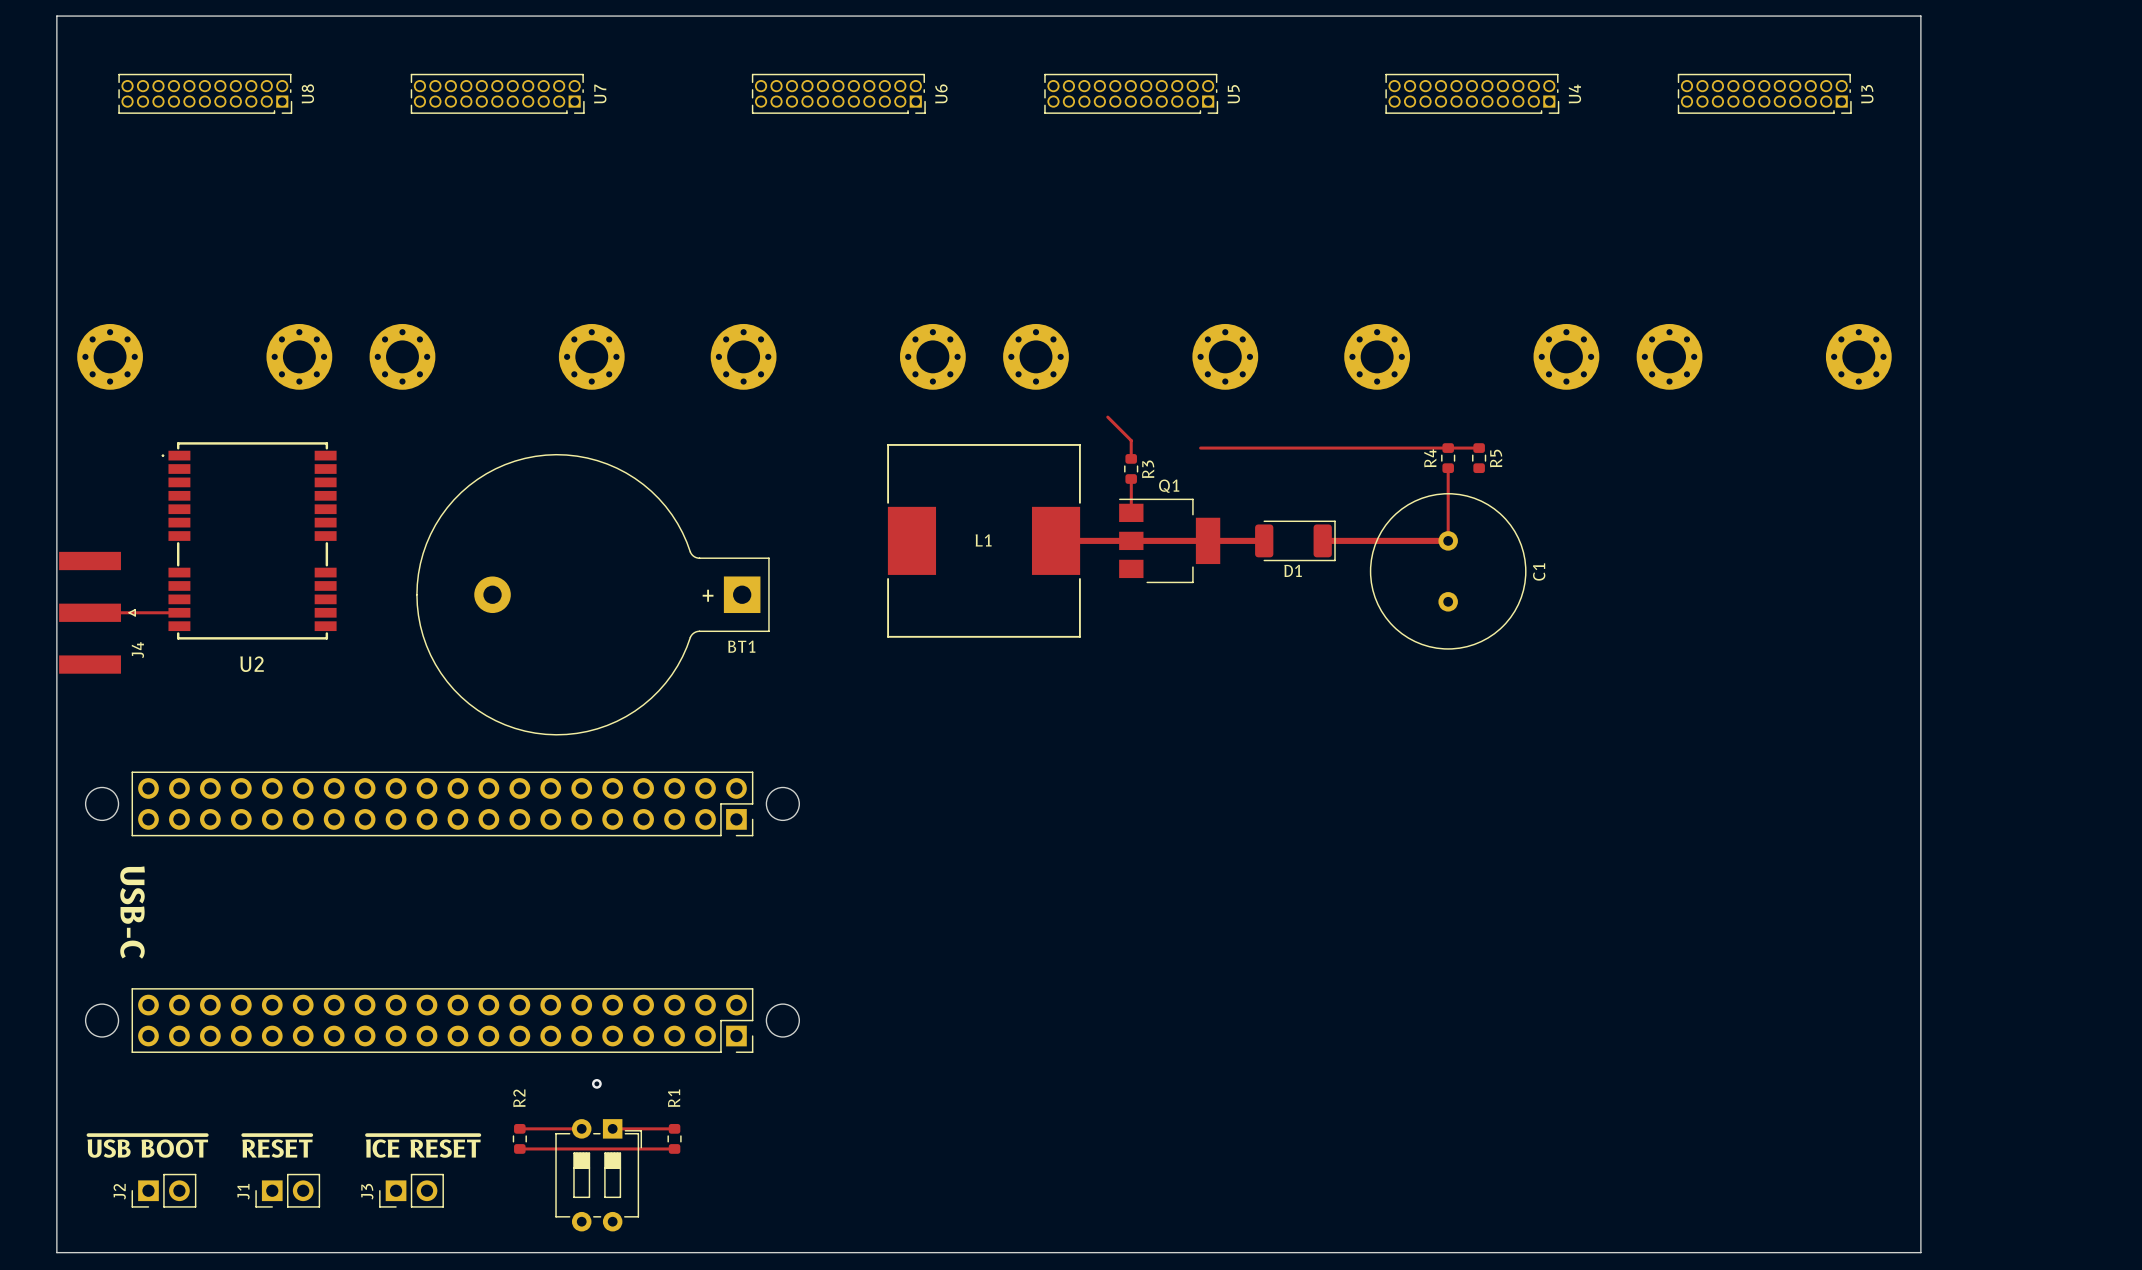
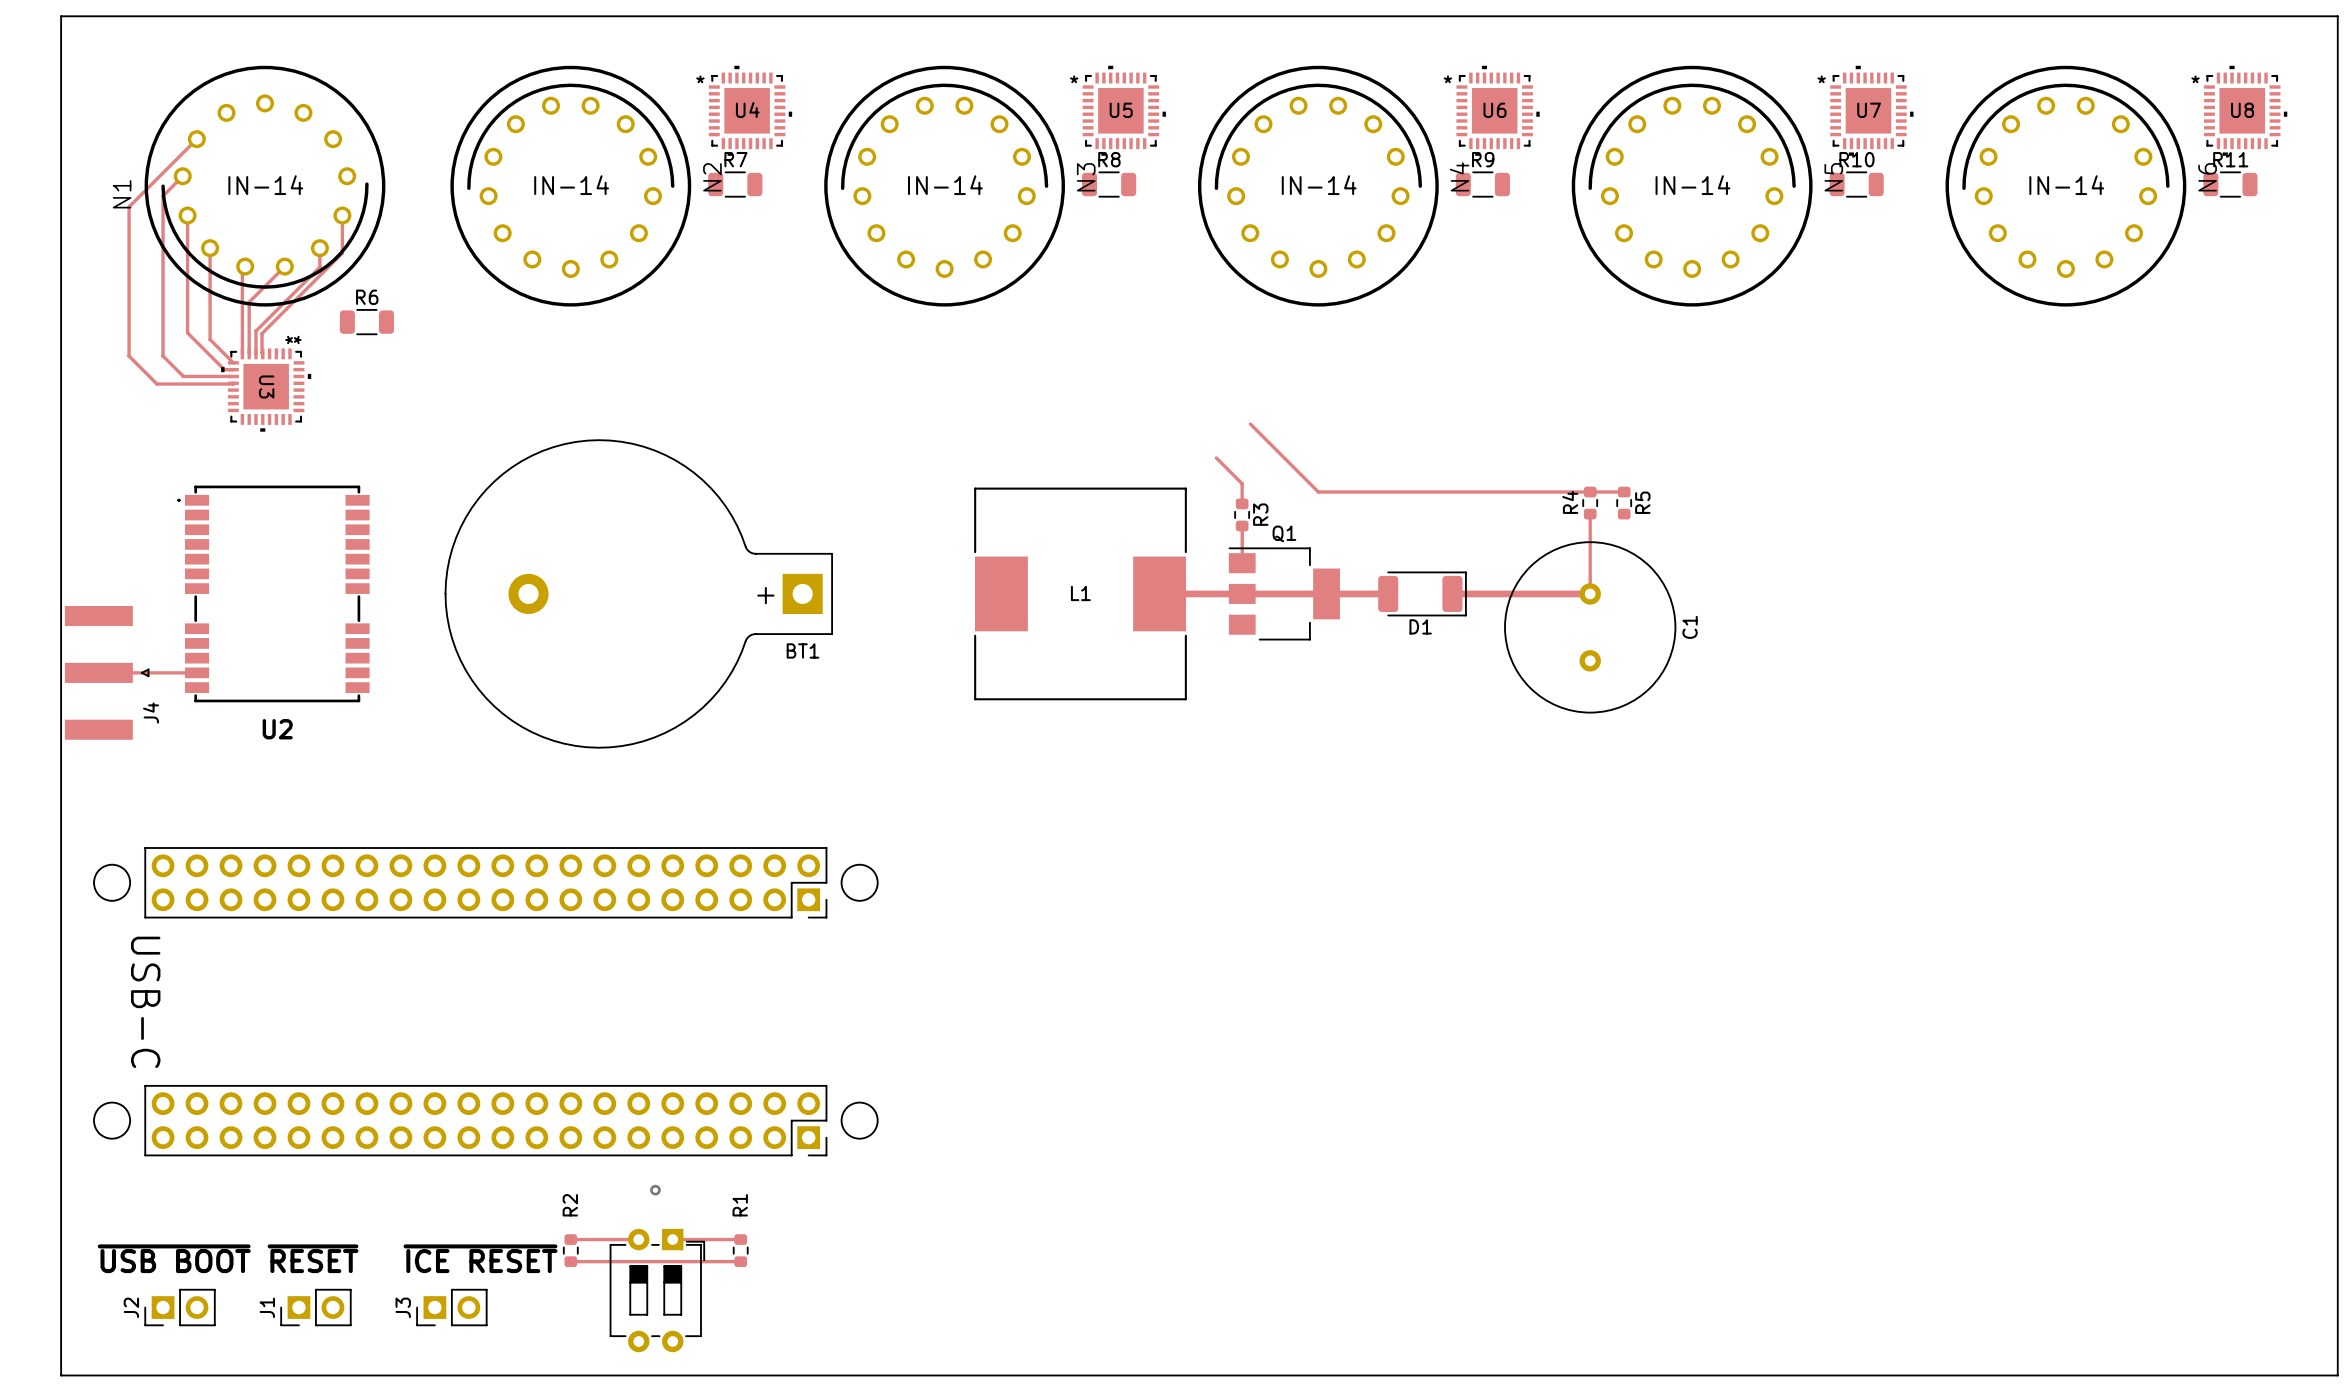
U8 footprint: [77, 73, 333, 390] -> [2204, 65, 2288, 156]
U7 footprint: [369, 73, 625, 390] -> [1830, 65, 1914, 156]
U6 footprint: [710, 73, 966, 390] -> [1456, 65, 1540, 156]
U5 footprint: [1003, 73, 1259, 390] -> [1082, 65, 1166, 156]
U4 footprint: [1344, 73, 1600, 390] -> [708, 65, 793, 156]
U3 footprint: [1636, 73, 1892, 390] -> [221, 348, 312, 432]
U8 name position: U8 (307, 93) -> U8 (2242, 110)
U6 name position: U6 (941, 93) -> U6 (1494, 110)
U7 name position: U7 (600, 94) -> U7 (1869, 110)
U5 name position: U5 (1233, 94) -> U5 (1121, 110)
U4 name position: U4 (1574, 94) -> U4 (747, 109)
U3 name position: U3 (1867, 94) -> U3 (266, 386)
track: none -> (196, 139) (129, 206) (129, 356) (157, 384) (233, 383)
track: none -> (182, 176) (163, 195) (163, 356) (183, 376) (233, 376)
R7: none -> (735, 184)
R8: none -> (1109, 184)
R9: none -> (1482, 184)
R10: none -> (1856, 184)
R11: none -> (2230, 184)
N1: none -> IN-14 (264, 186)
N2: none -> IN-14 (570, 186)
N3: none -> IN-14 (944, 186)
N4: none -> IN-14 (1318, 186)
N5: none -> IN-14 (1692, 186)
N6: none -> IN-14 (2065, 186)
track: none -> (187, 215) (187, 332) (224, 369) (233, 369)
track: none -> (342, 215) (342, 253) (262, 333) (262, 353)
track: none -> (210, 248) (210, 339) (233, 362)
track: none -> (319, 248) (319, 267) (255, 331) (255, 353)
track: none -> (245, 266) (242, 269) (242, 353)
track: none -> (284, 266) (249, 302) (249, 353)
R6: none -> (366, 322)
track: none -> (1250, 424) (1318, 492)
BT1 position: (592, 594) -> (638, 593)
board edge: (56, 1252) (56, 16) (1920, 16) (1920, 1252) -> (62, 1375) (61, 16) (2337, 16) (2337, 1375) (2109, 1375)

